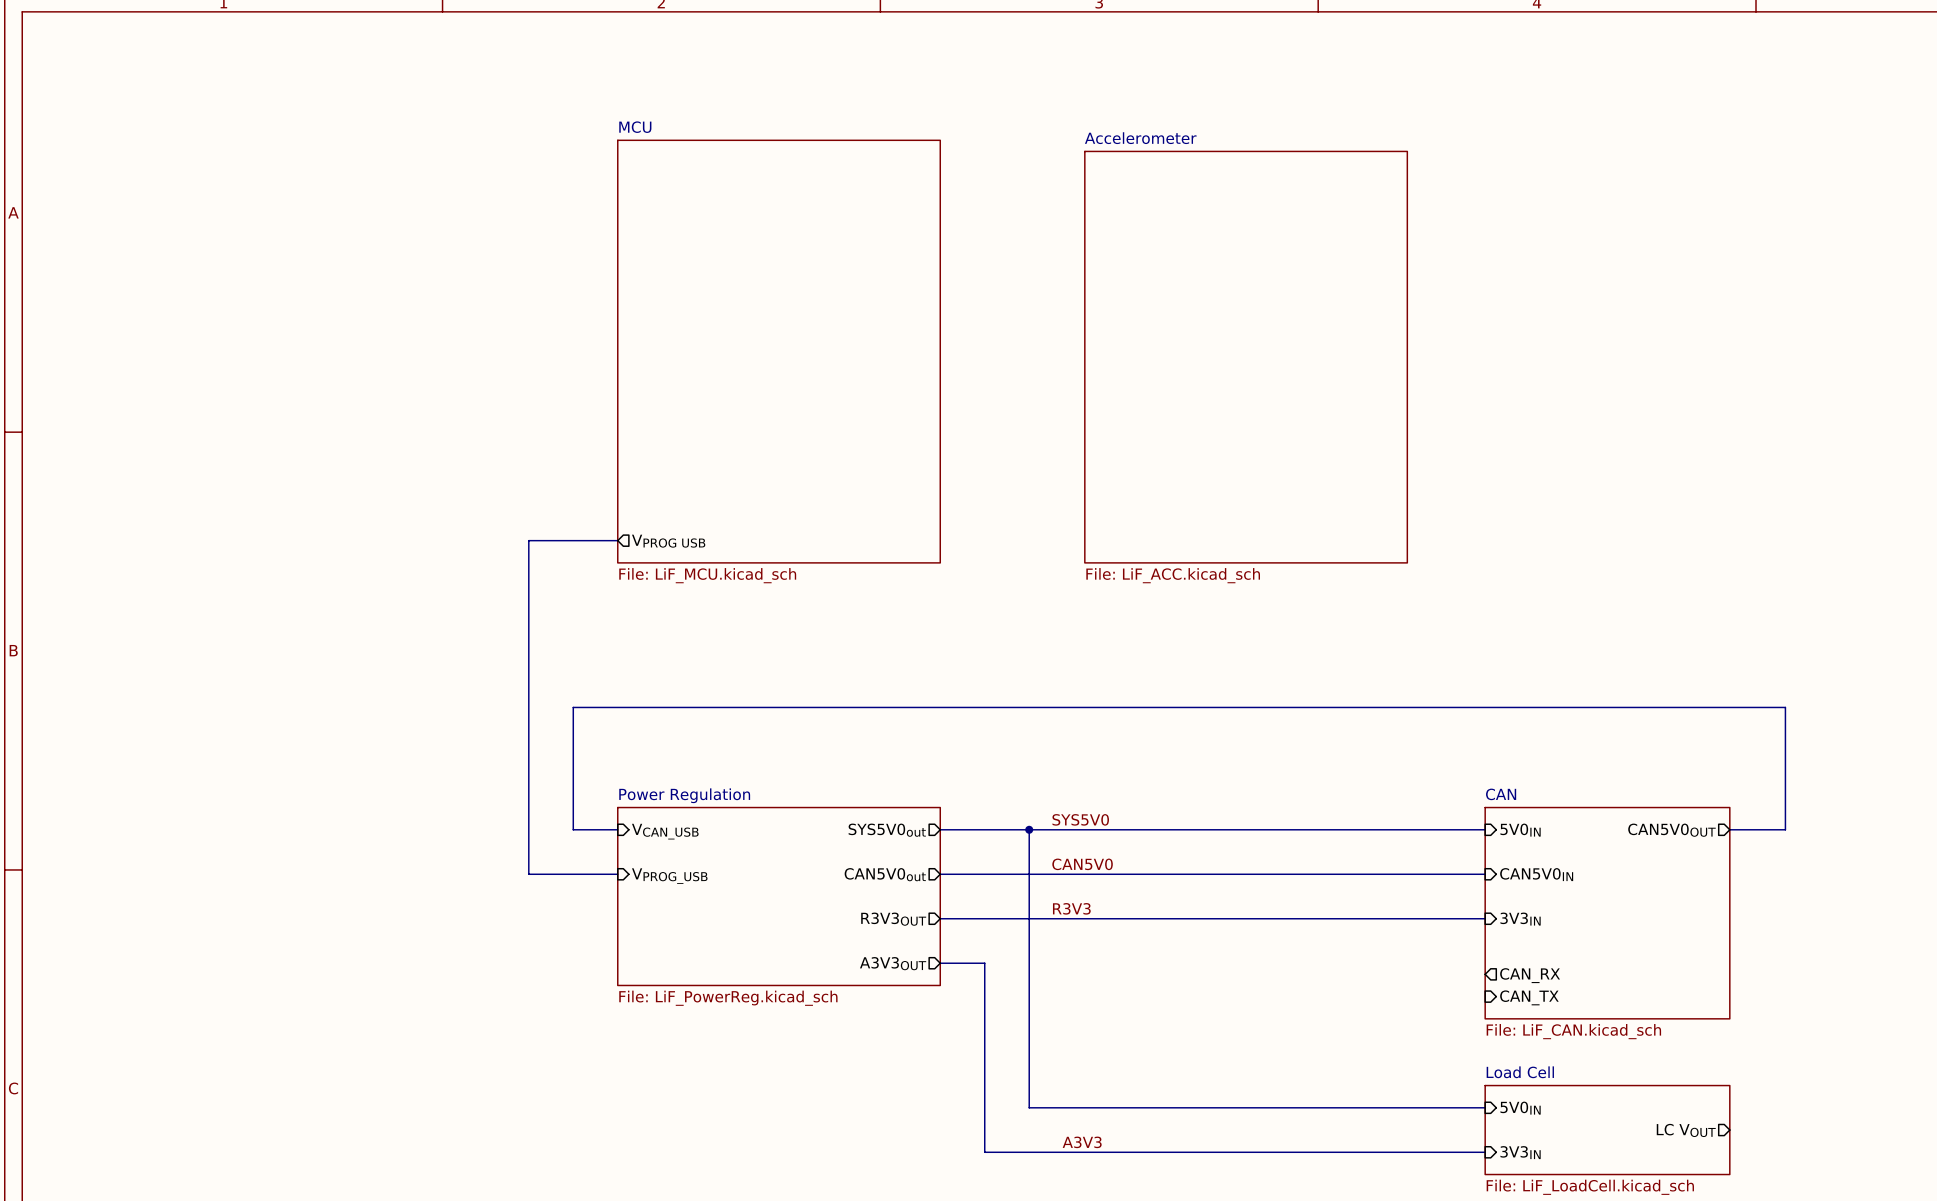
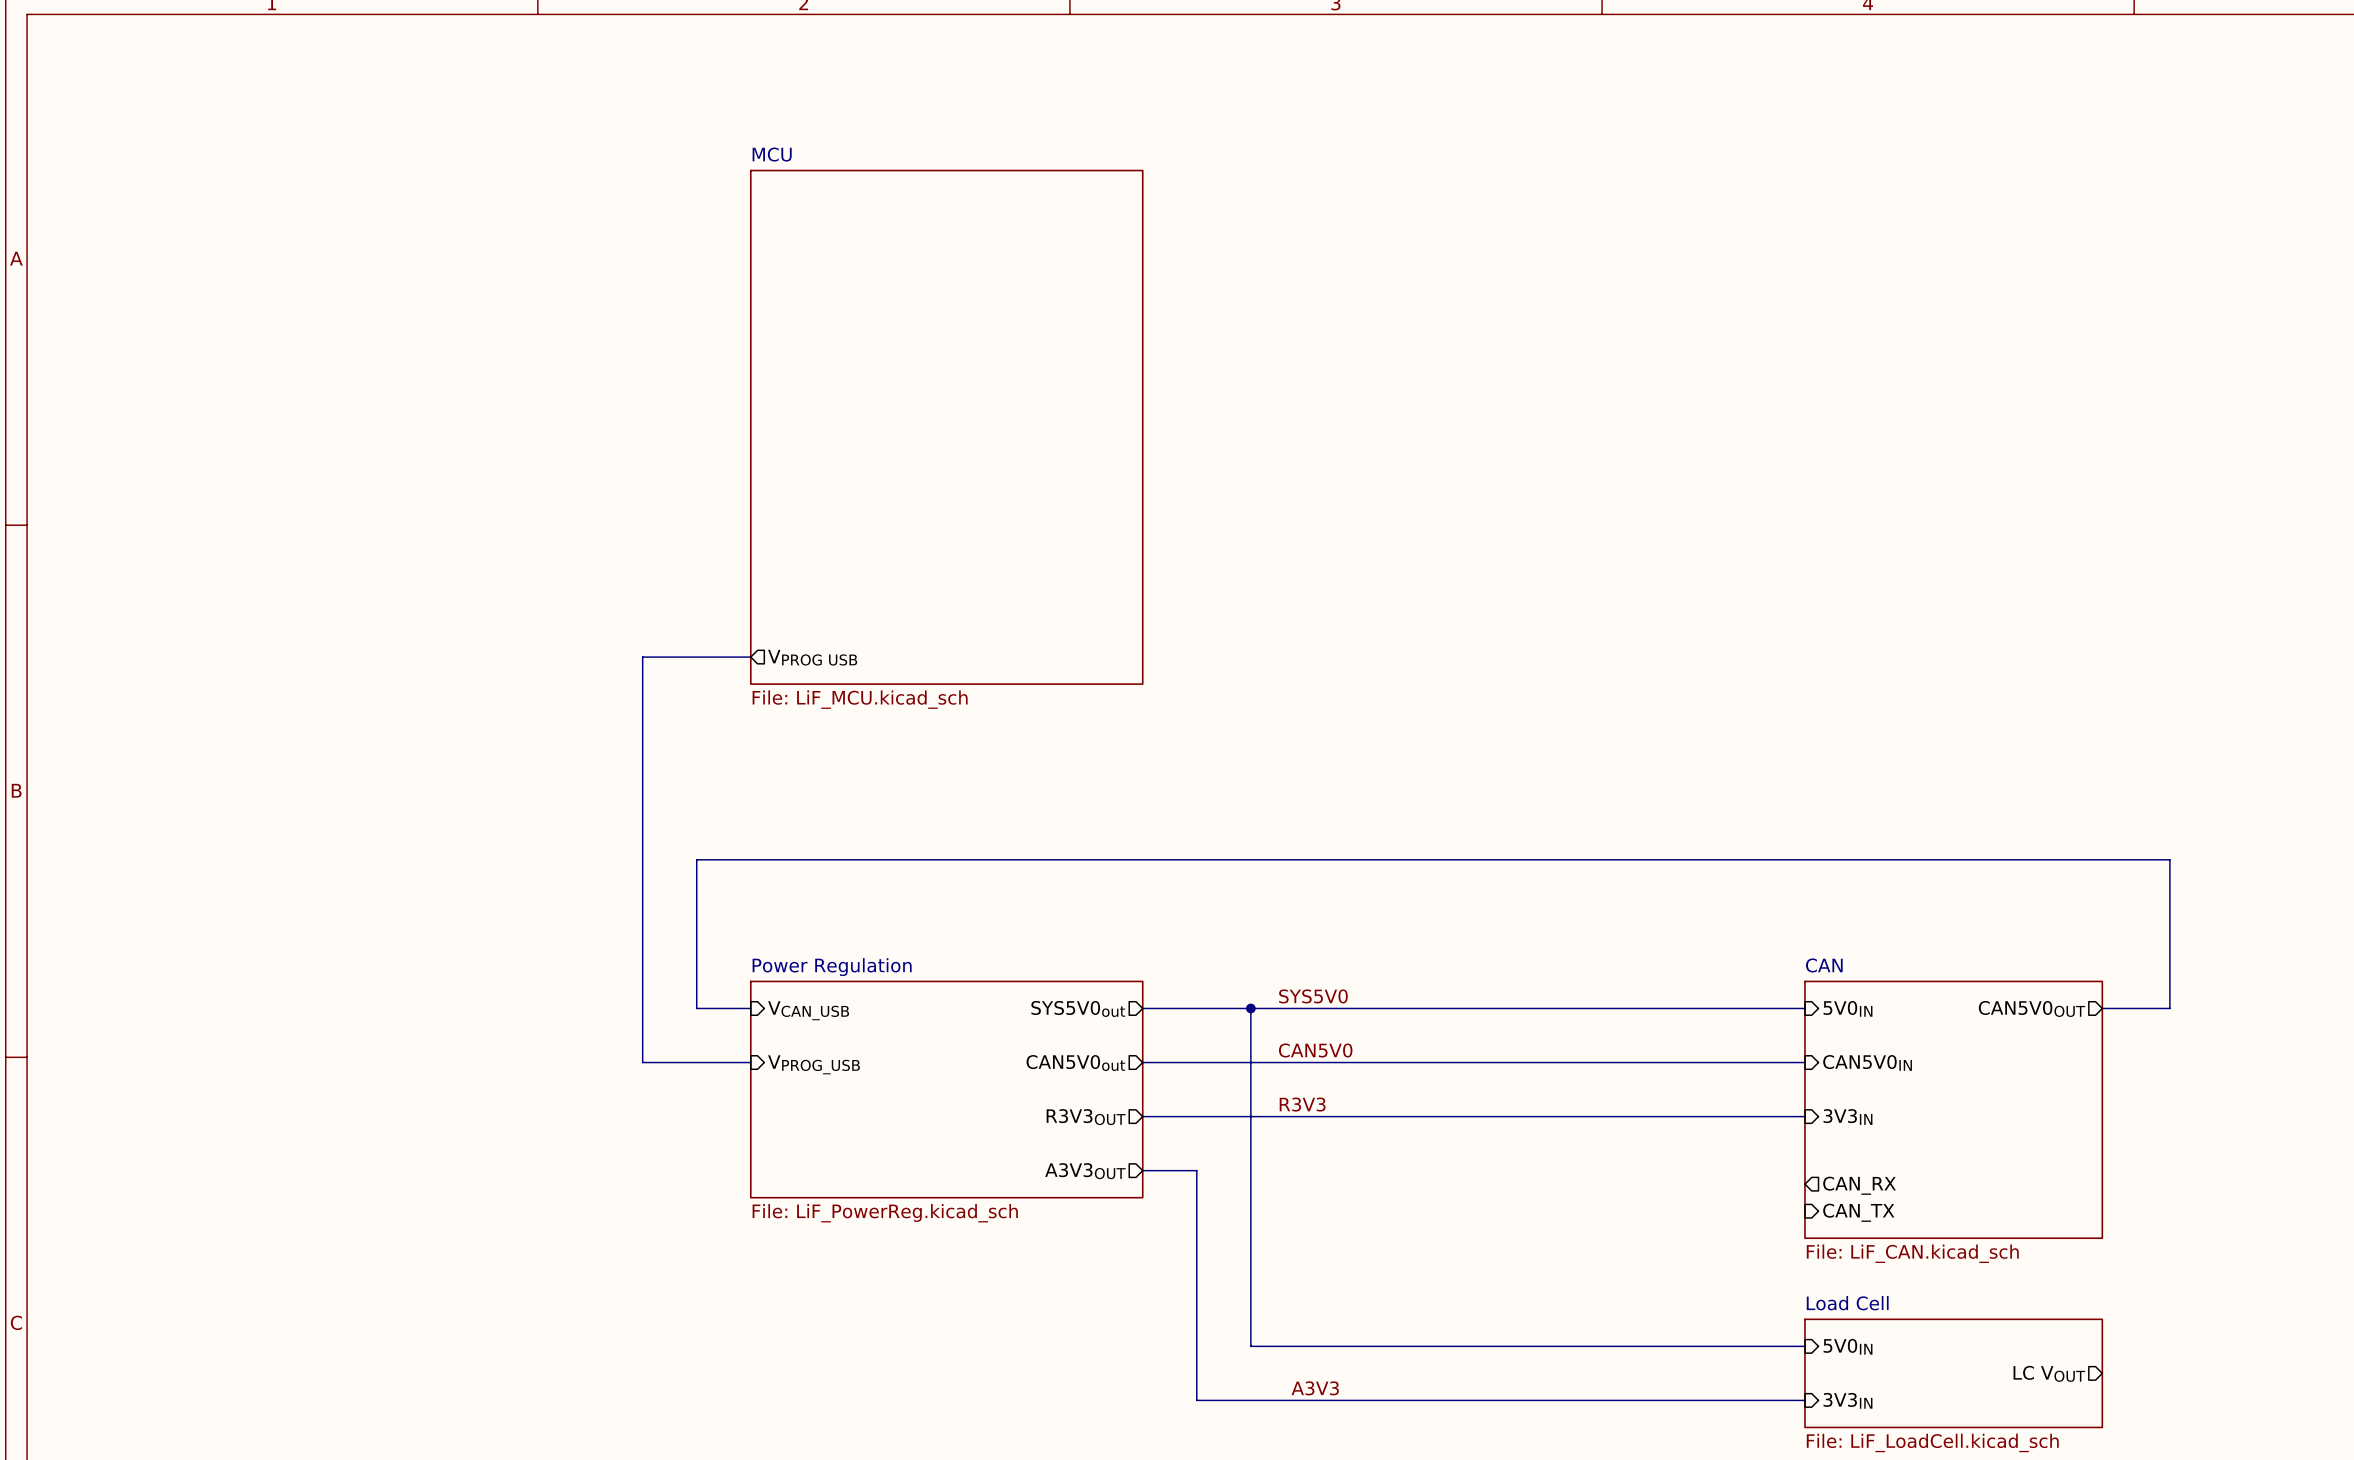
sheet Accelerometer: File: LiF_ACC.kicad_sch (1246, 357) -> none

